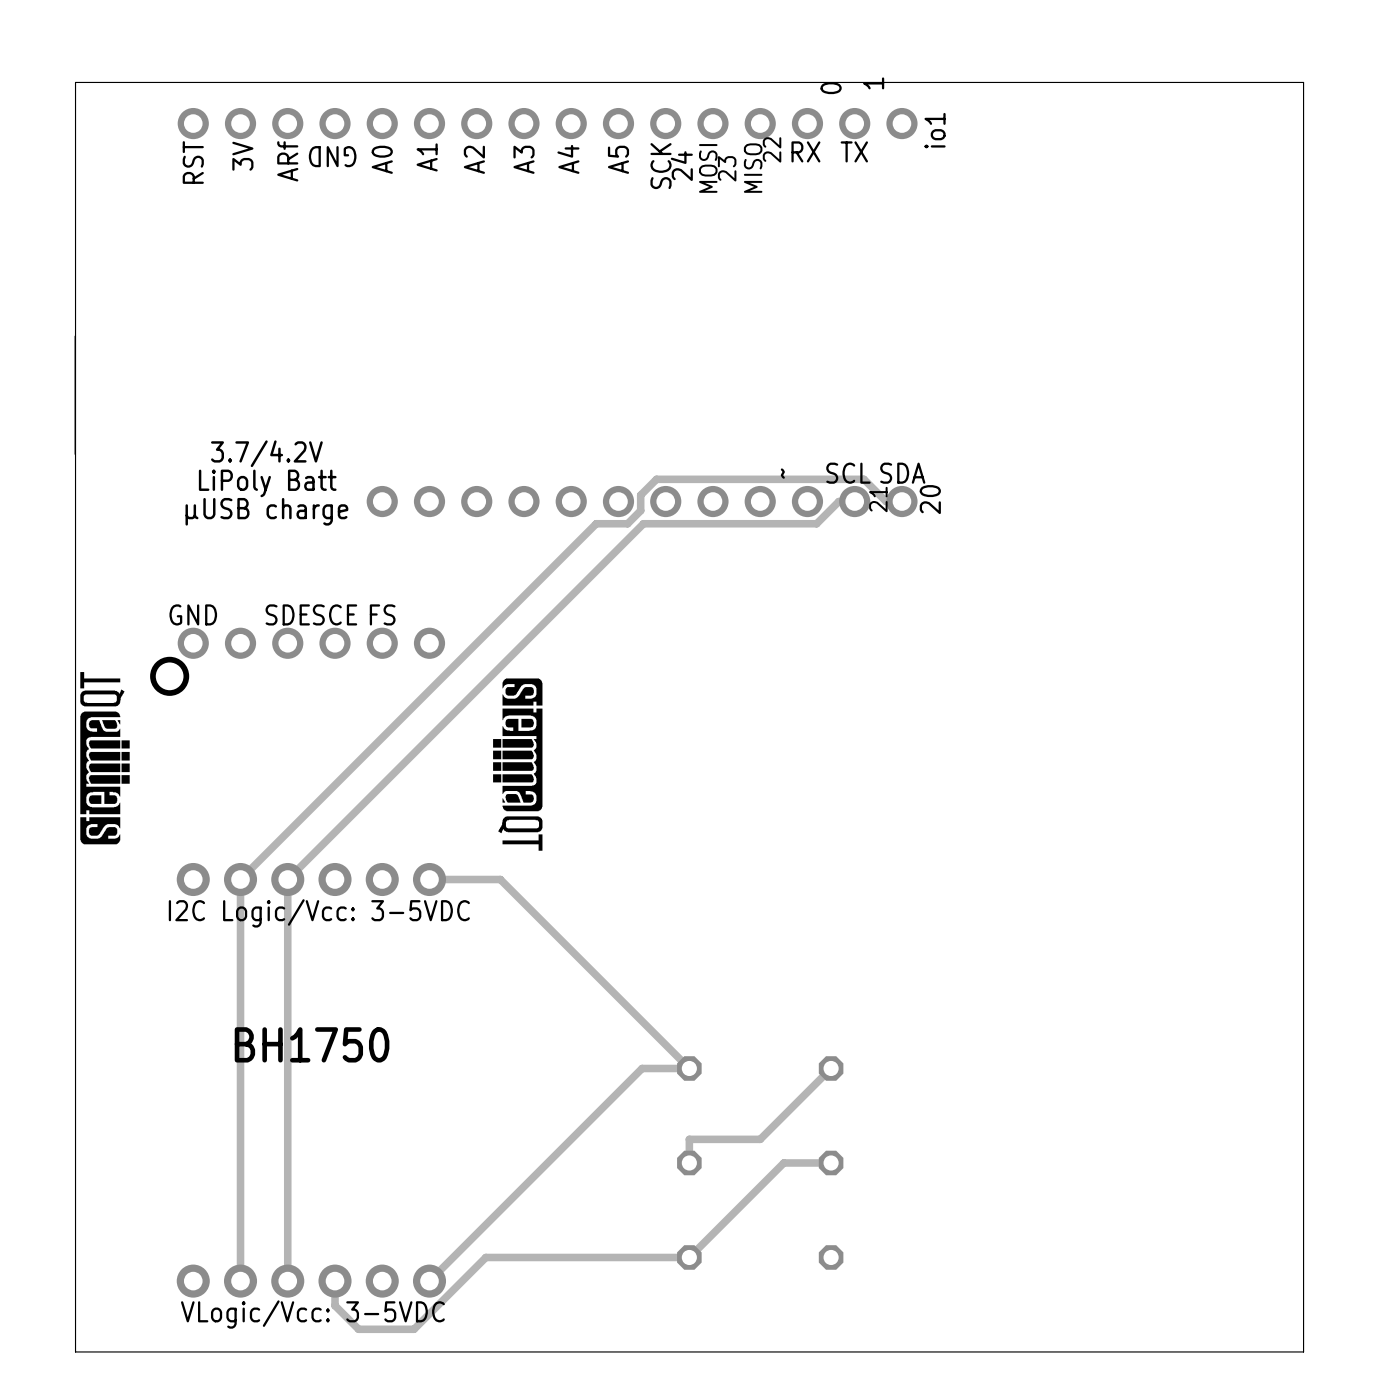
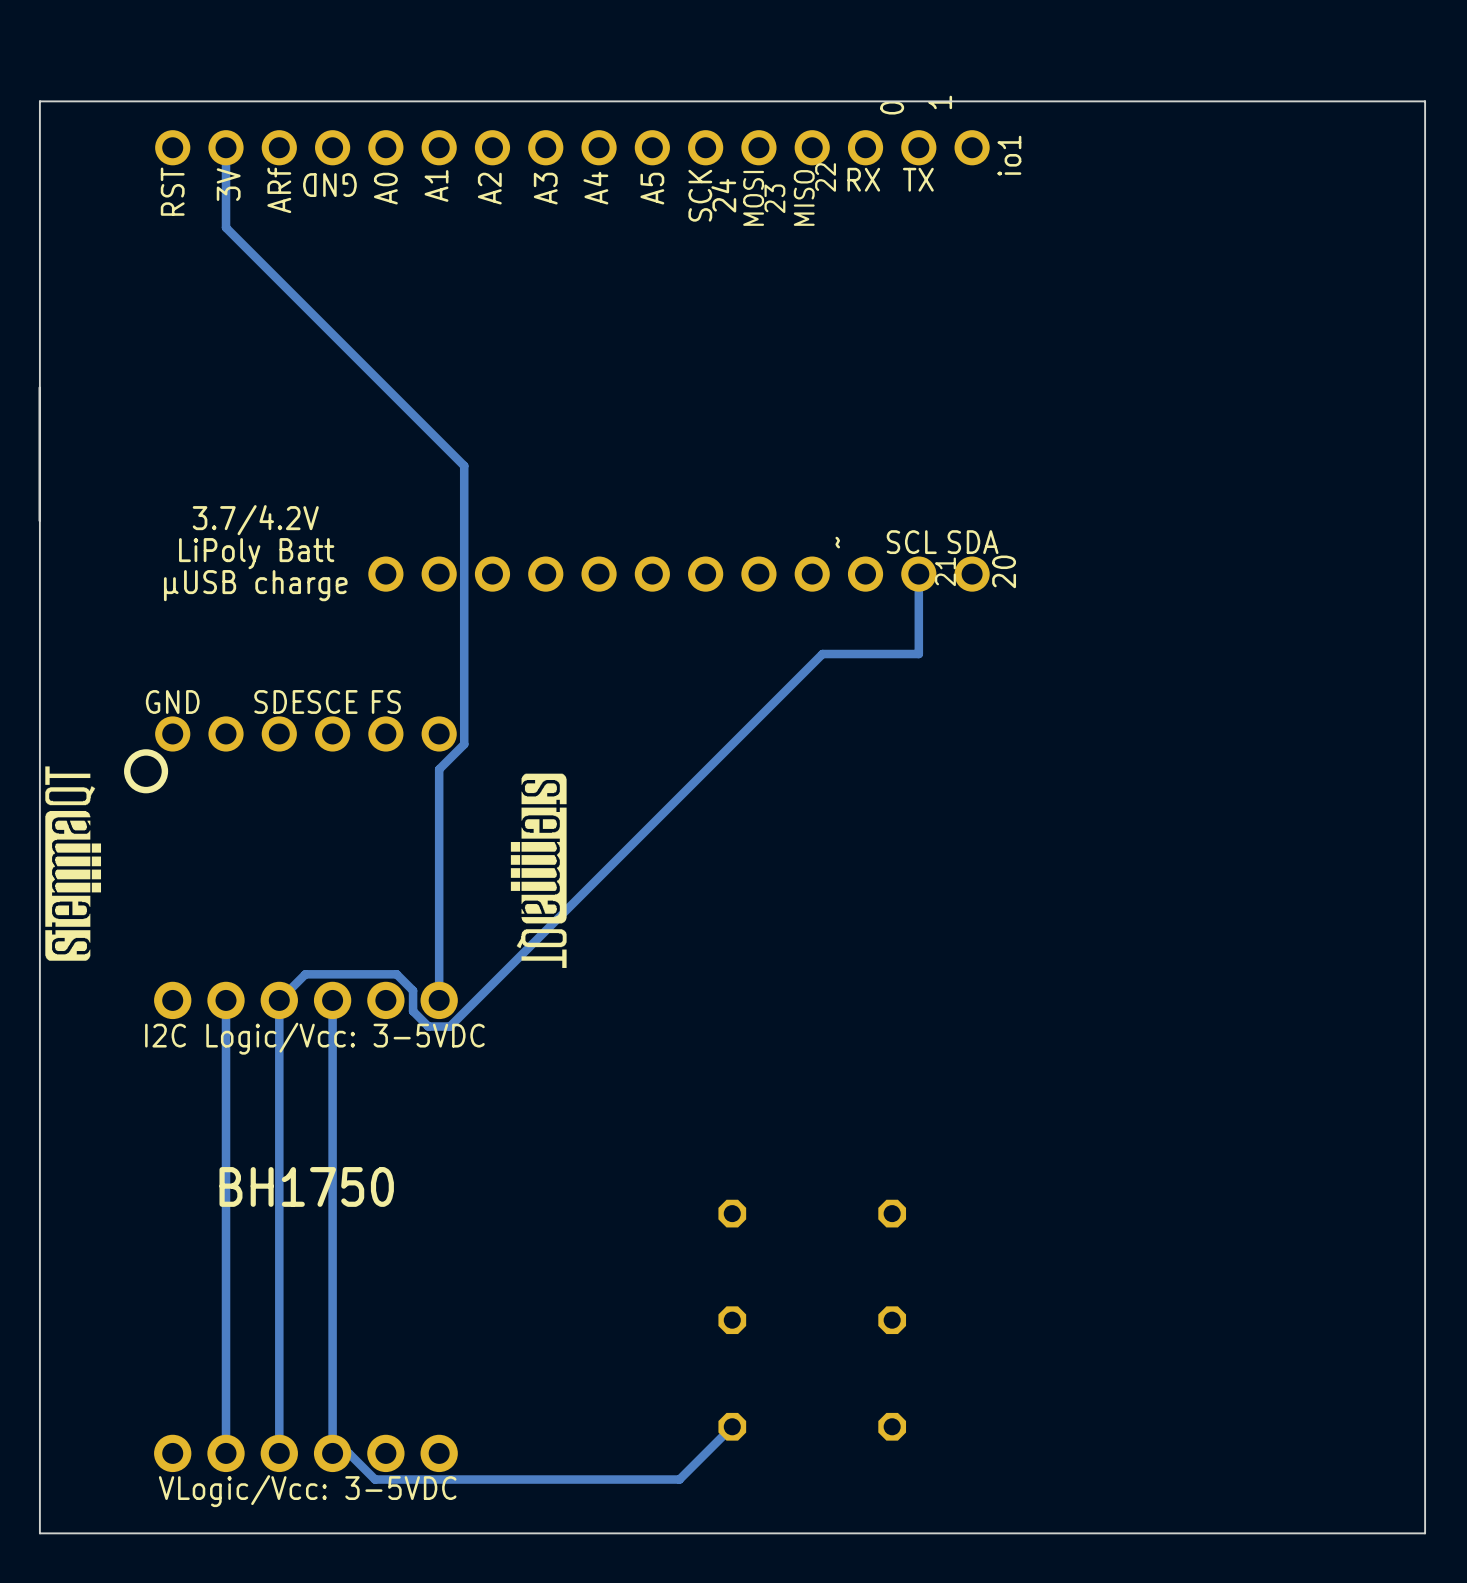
track: (854, 501) (838, 501) (816, 523) (643, 523) (310, 856) -> (918, 574) (918, 654) (822, 654) (450, 1026) (428, 1026) (413, 1011) (413, 990) (396, 974) (305, 974)
track: (901, 501) (886, 501) (863, 479) (656, 479) (640, 495) (640, 510) (627, 523) (596, 523) (240, 879) -> none
track: none -> (332, 1000) (332, 1453) (348, 1453) (375, 1479) (679, 1479) (732, 1426)
track: (429, 879) (500, 879) (689, 1068) (642, 1068) (429, 1281) -> (439, 1000) (439, 769) (464, 744) (464, 465) (226, 227) (226, 147)
track: (831, 1068) (760, 1139) (689, 1139) (689, 1162) -> none
track: (831, 1162) (783, 1162) (689, 1257) (485, 1257) (414, 1329) (358, 1329) (335, 1305) (335, 1281) -> none

